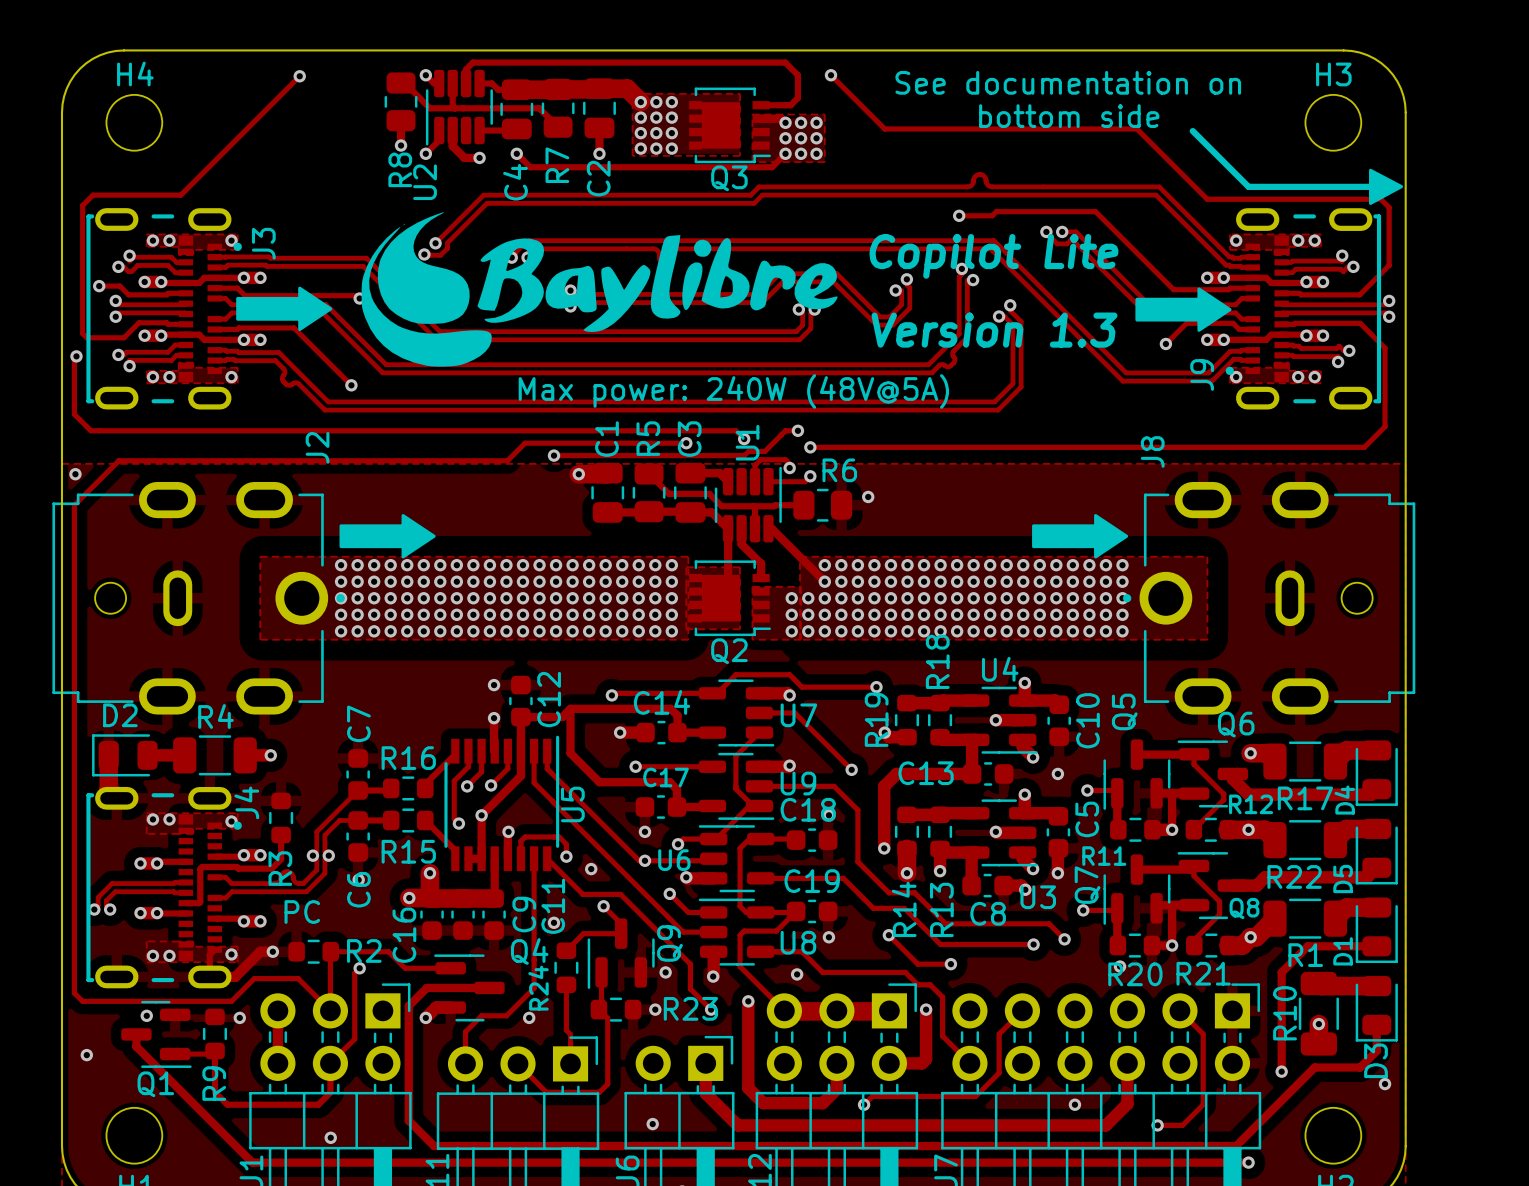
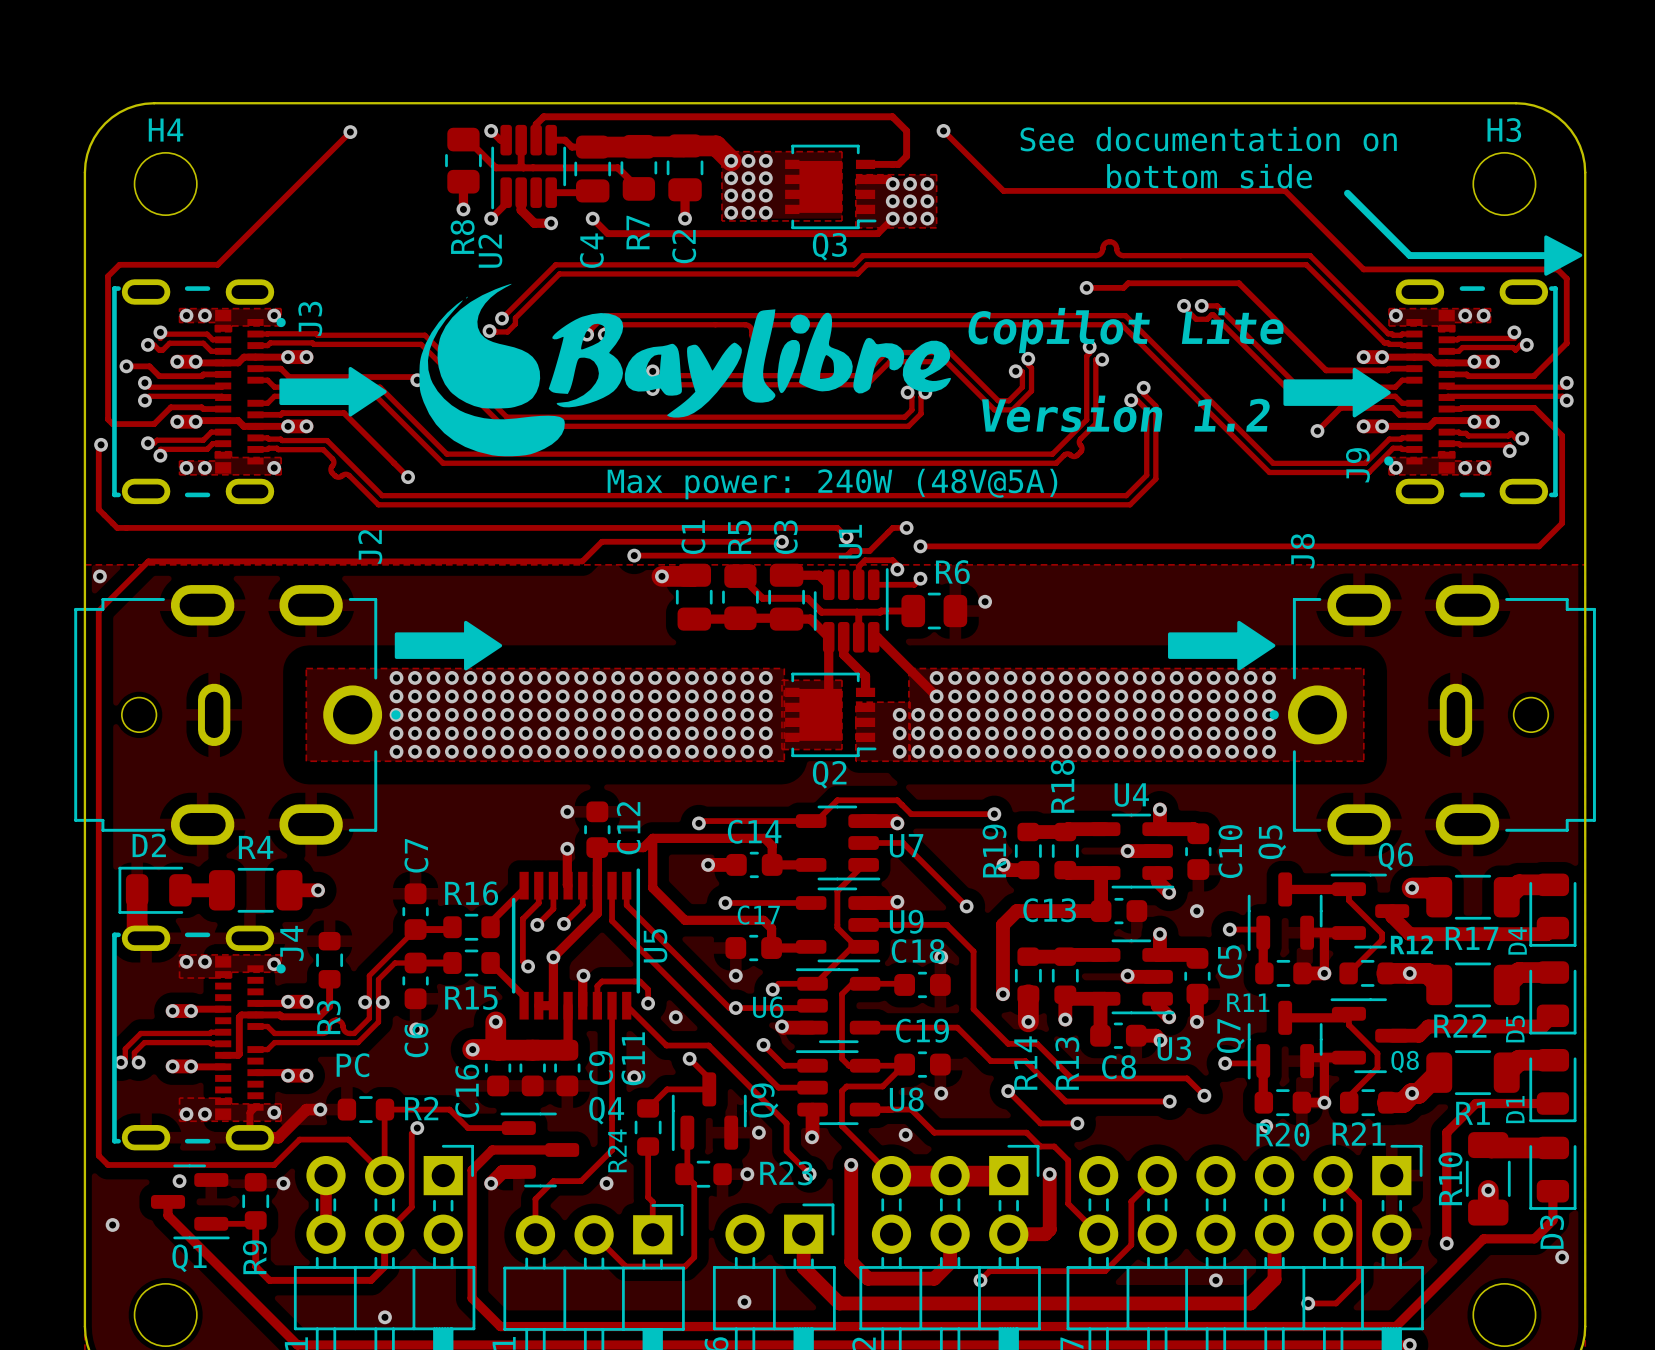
text: Version 1.3 (994, 330) -> Version 1.2 (1126, 413)

